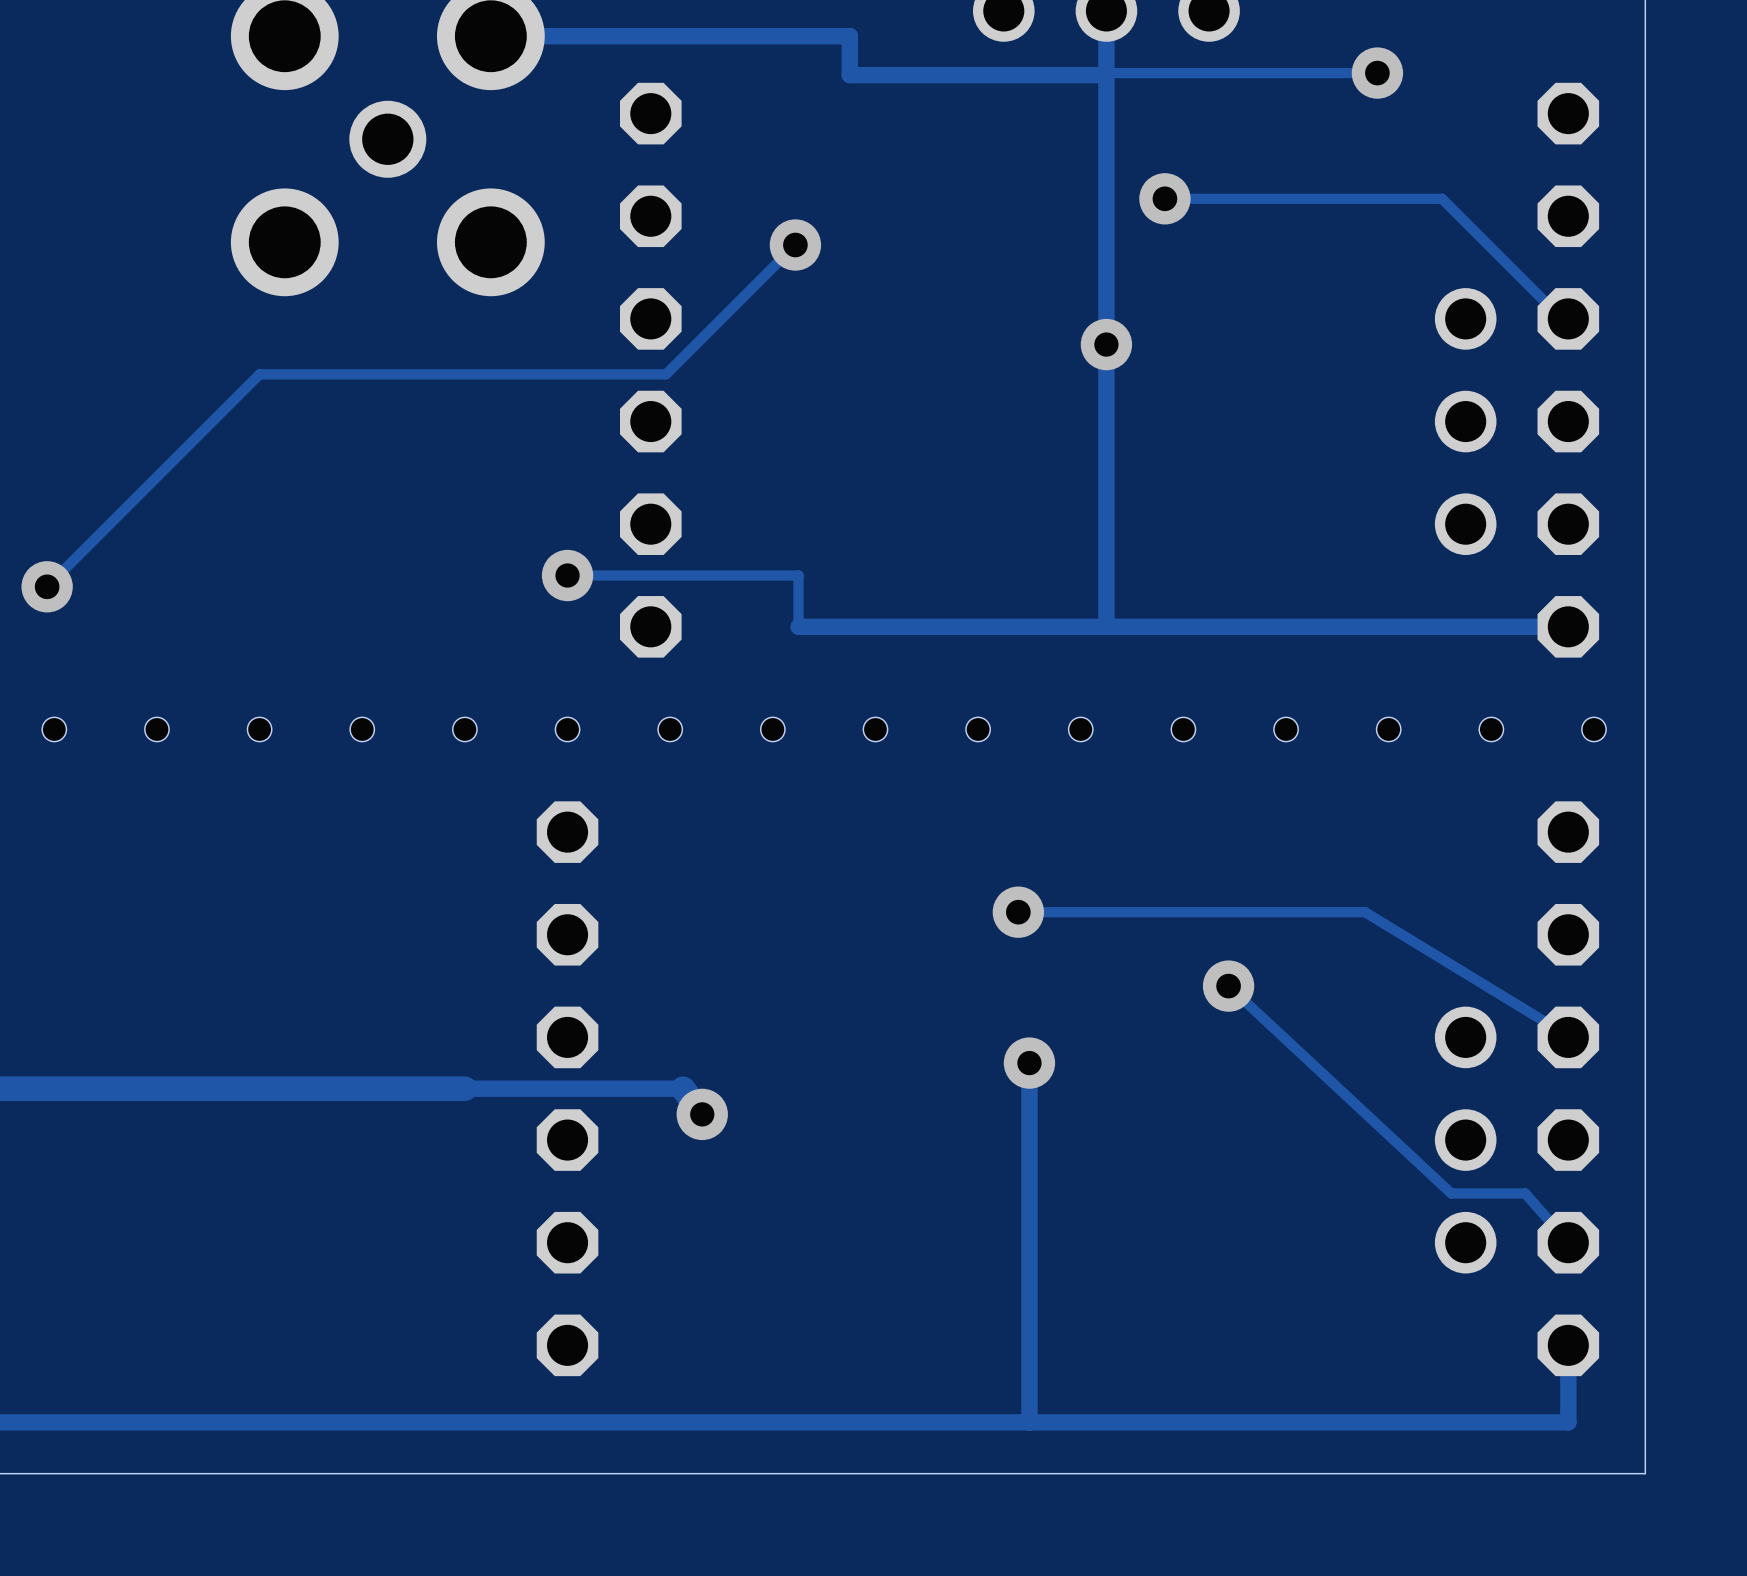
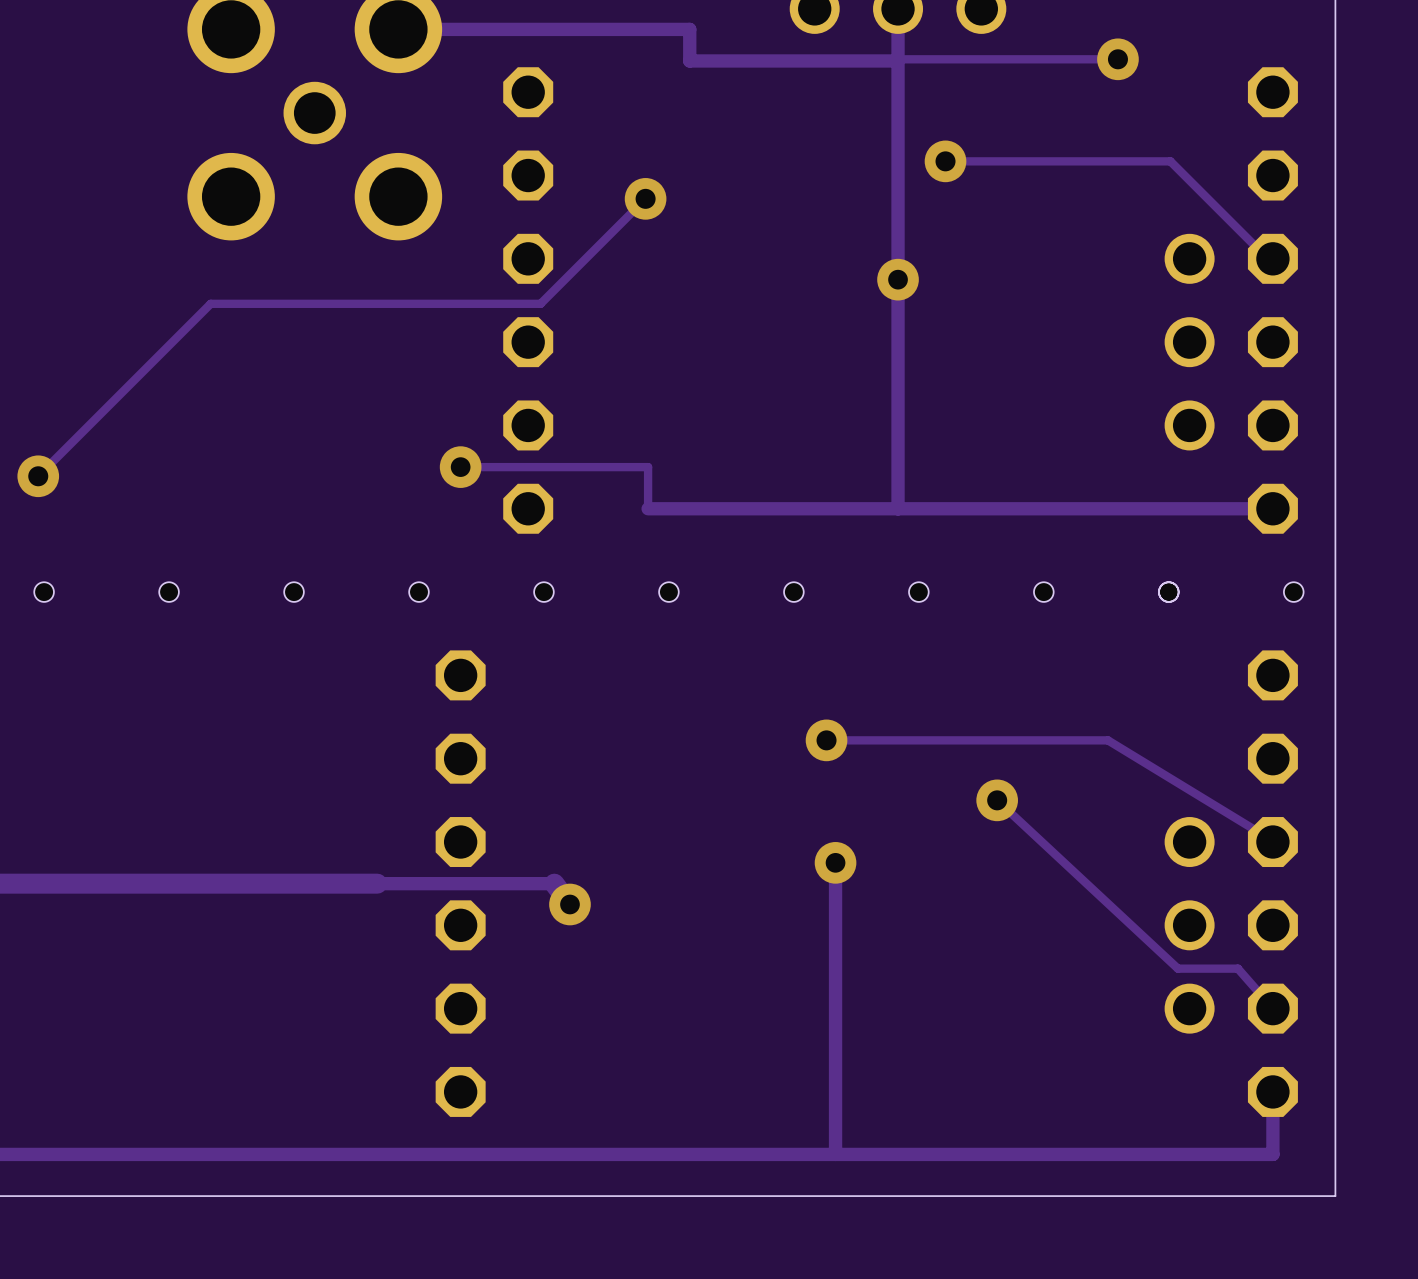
hole: (156, 729) -> none
hole: none -> (169, 592)
hole: (259, 729) -> none
hole: (464, 729) -> none
hole: none -> (418, 592)
hole: (567, 729) -> none
hole: (772, 729) -> none
hole: none -> (668, 592)
hole: (875, 729) -> none
hole: (1080, 729) -> none
hole: none -> (918, 592)
hole: (1183, 729) -> none
hole: (1388, 729) -> none
hole: none -> (1168, 592)
hole: (1491, 729) -> none

